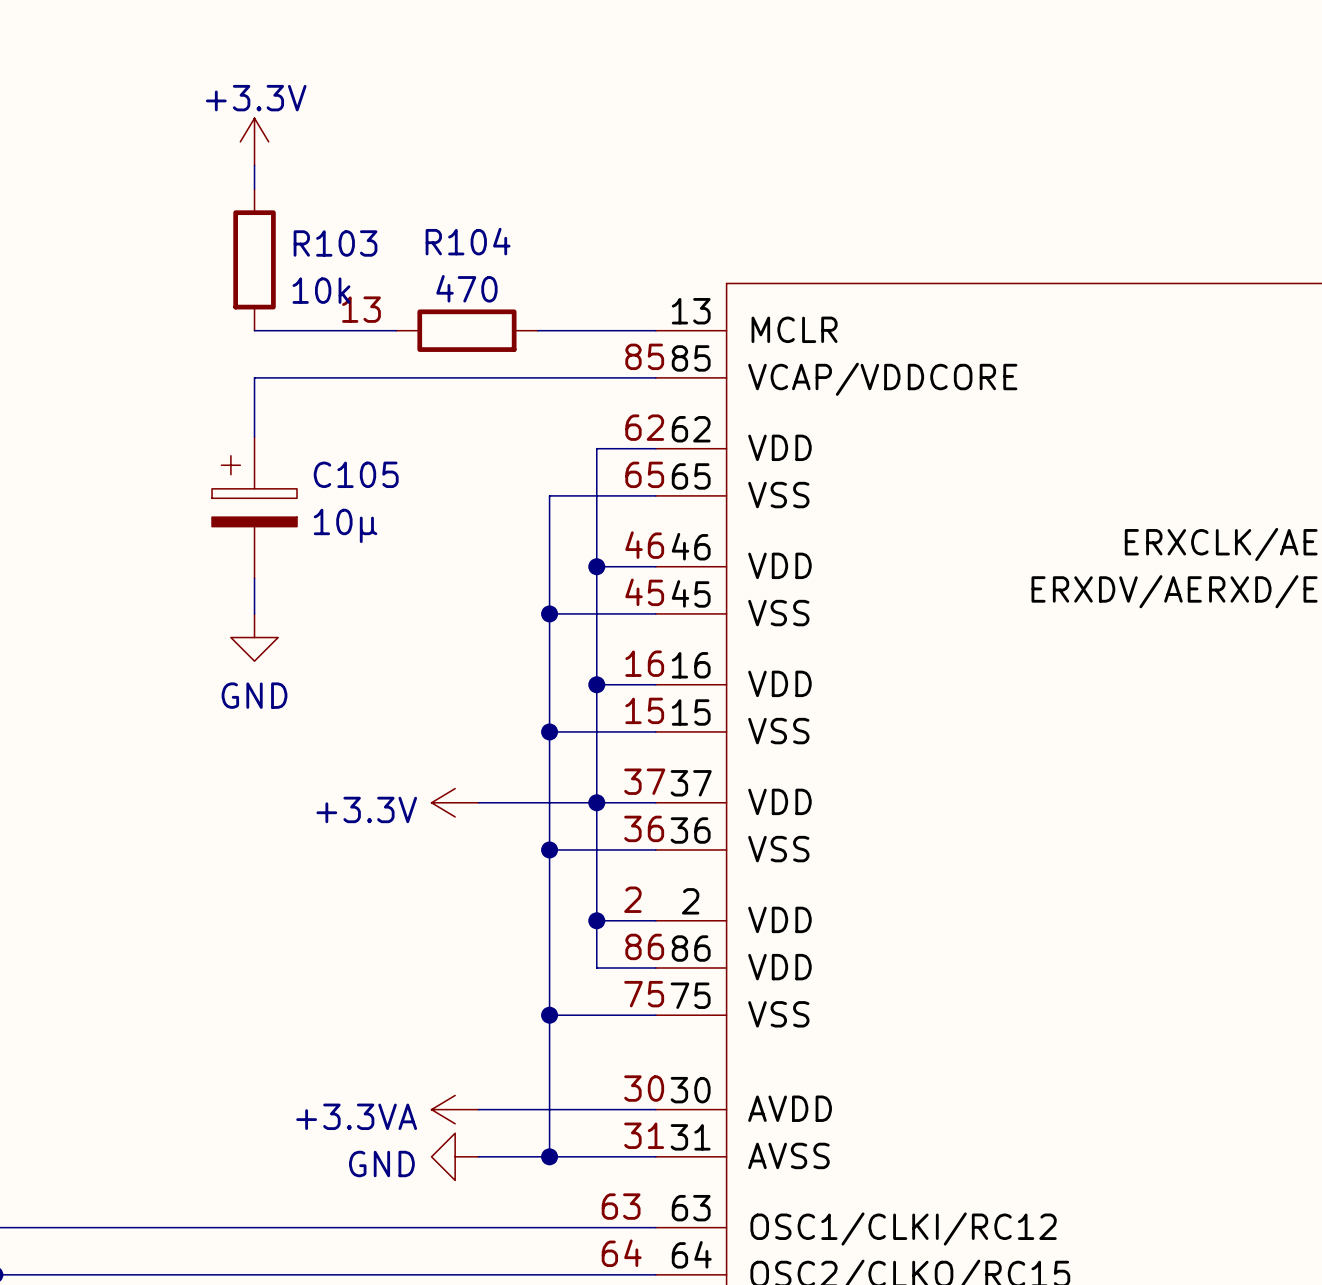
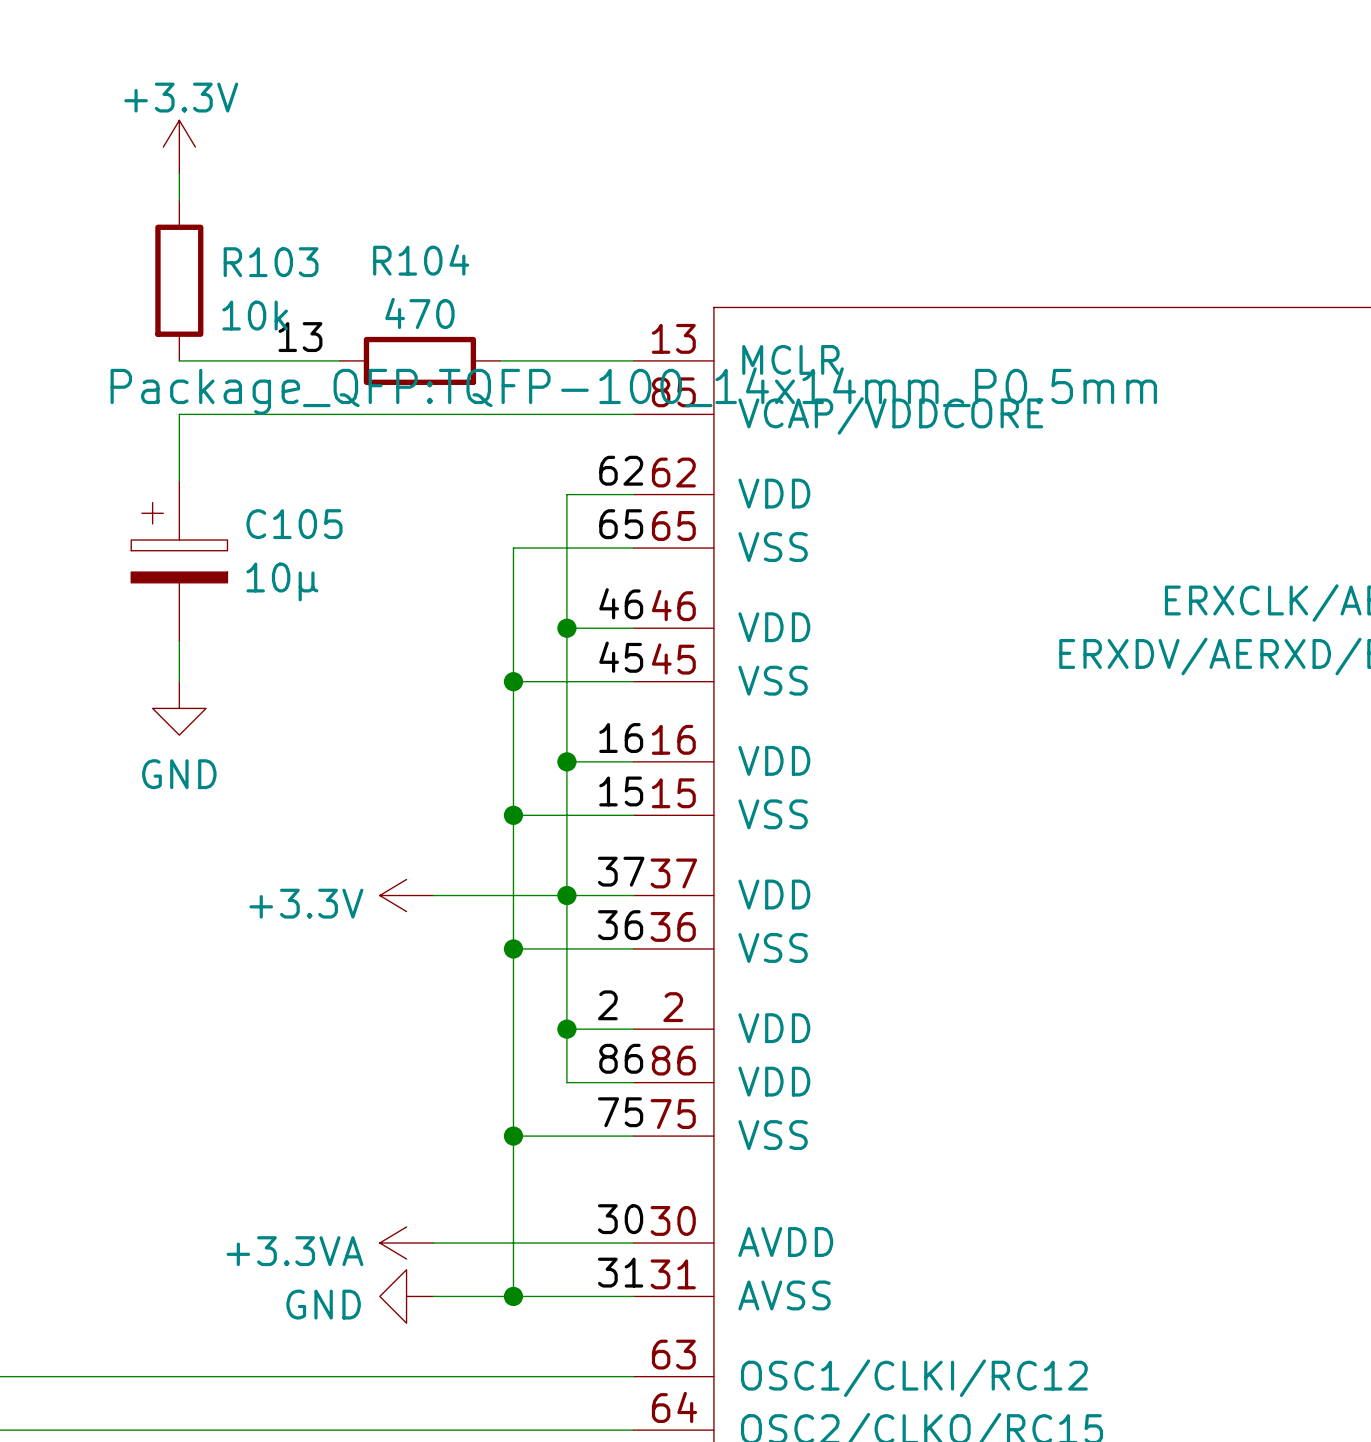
label: 85 (644, 356) -> none
part text: none -> Package_QFP:TQFP-100_14x14mm_P0.5mm (633, 391)
label: 63 (621, 1206) -> none
label: 64 (621, 1253) -> none

